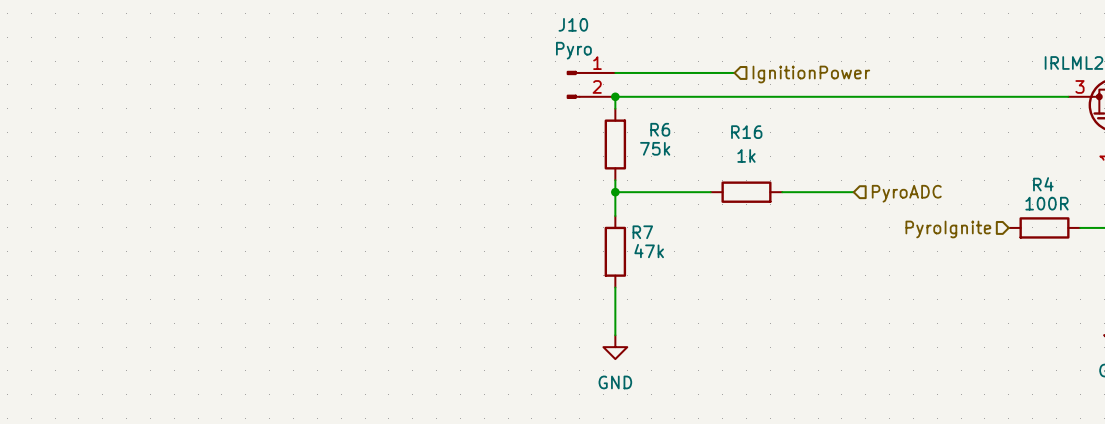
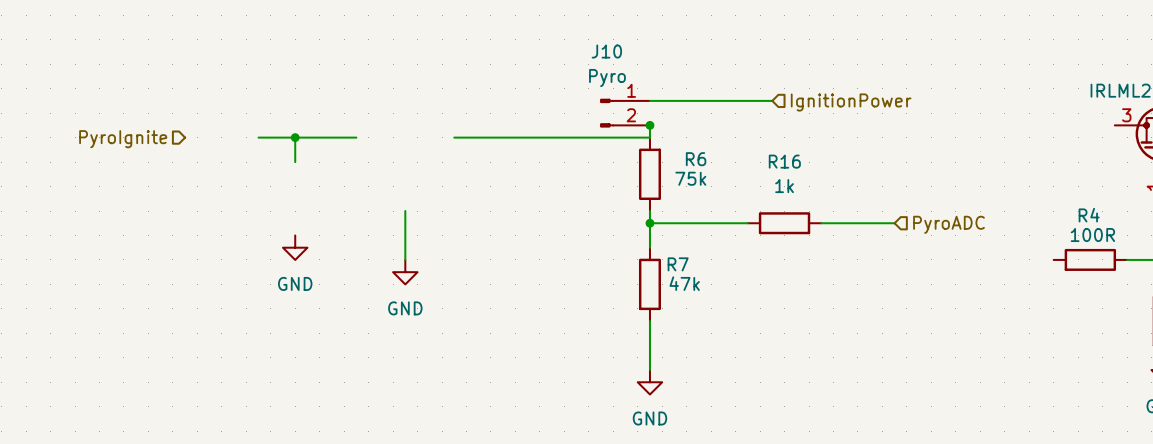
wire: (615, 96) (1068, 96) -> none
wire: none -> (258, 137) (356, 137)
wire: none -> (295, 137) (295, 162)
junction: none -> (295, 137)
wire: none -> (454, 137) (649, 137)
hierarchical label: none -> PyroIgnite (123, 139)
wire: none -> (405, 211) (405, 259)
power symbol: none -> GND (295, 247)
hierarchical label: PyroIgnite (948, 229) -> none
power symbol: none -> GND (405, 272)

